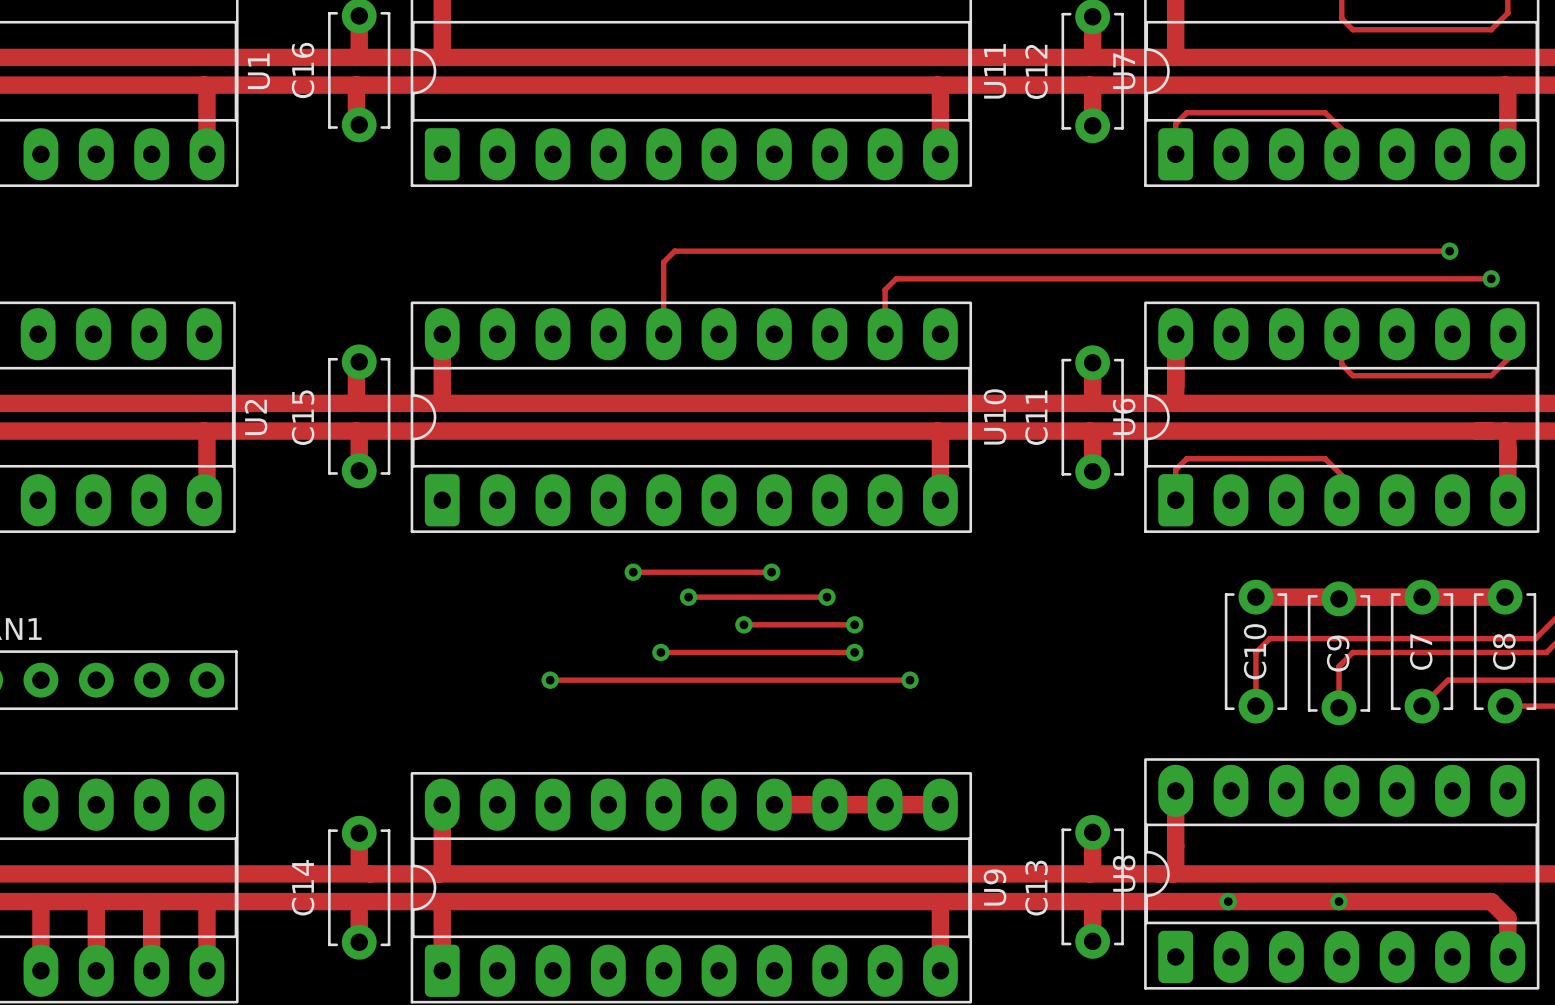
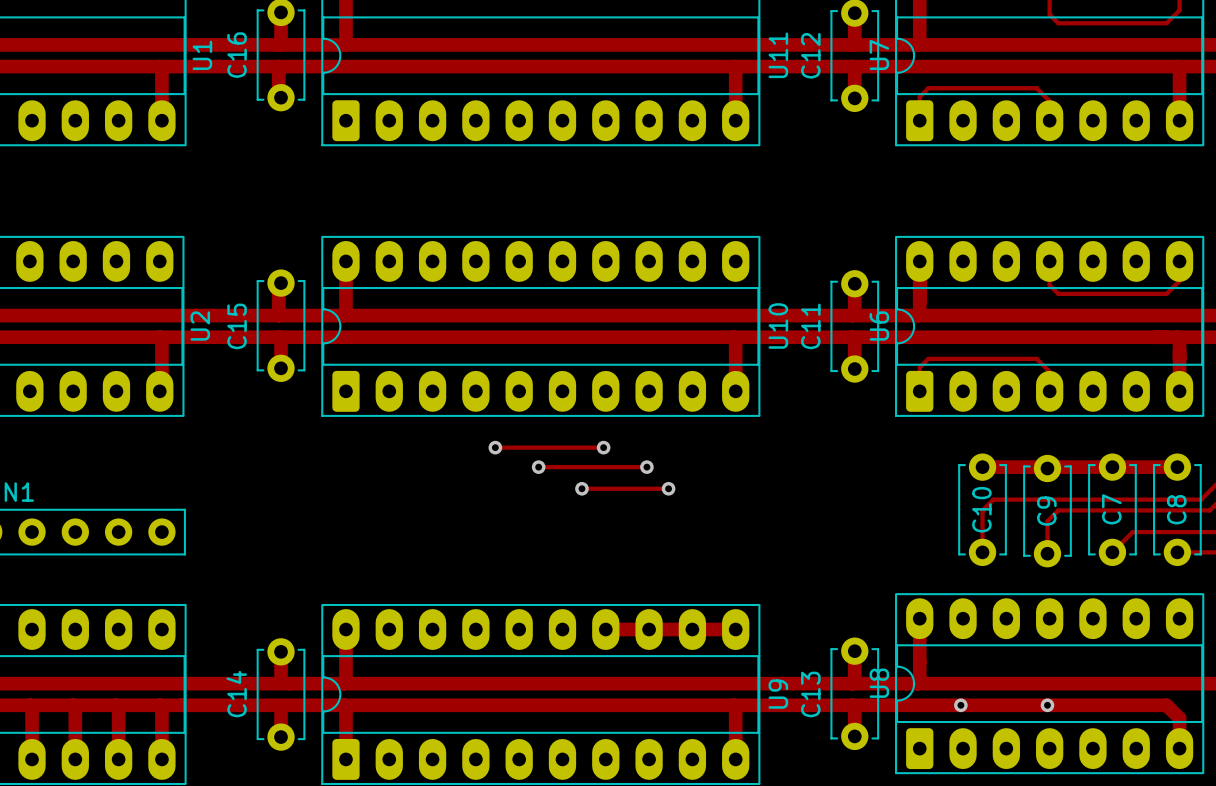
track: (1449, 251) (674, 251) (663, 262) (663, 334) -> none
via: (1449, 251) -> none
track: (1491, 278) (896, 278) (885, 289) (885, 334) -> none
via: (1491, 278) -> none
track: (660, 652) (854, 652) -> none
via: (660, 652) -> none
via: (854, 652) -> none
track: (550, 680) (910, 680) -> none
via: (550, 680) -> none
via: (910, 680) -> none

